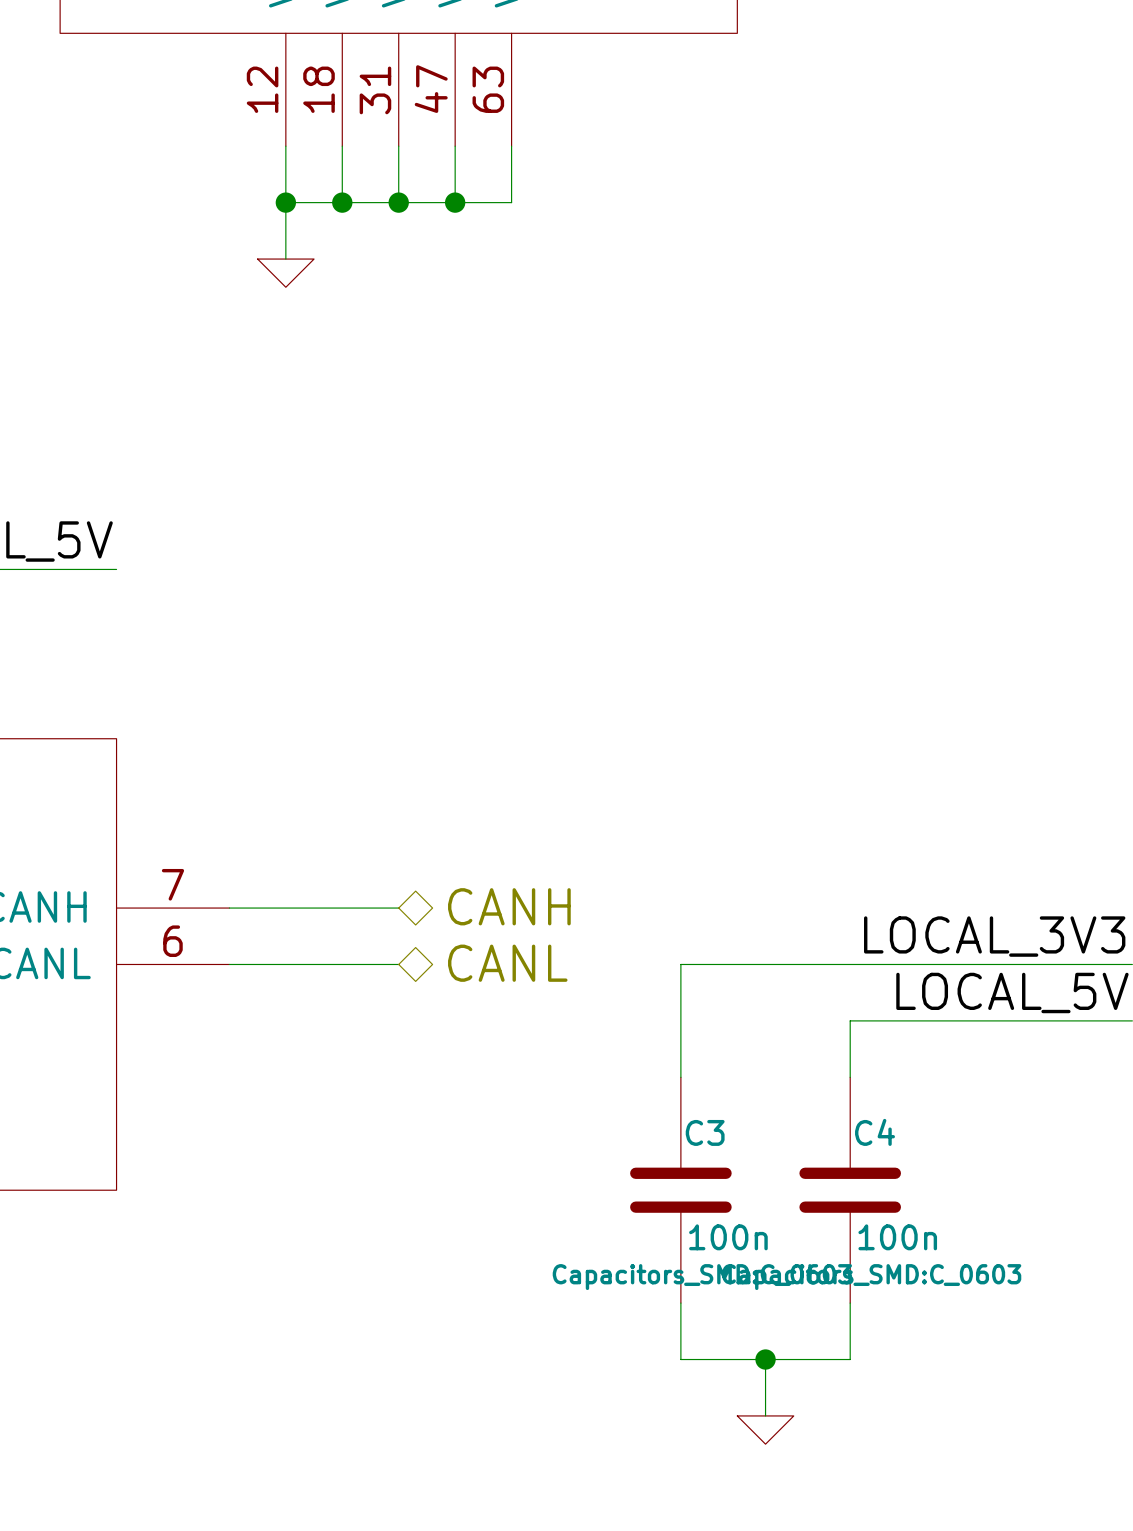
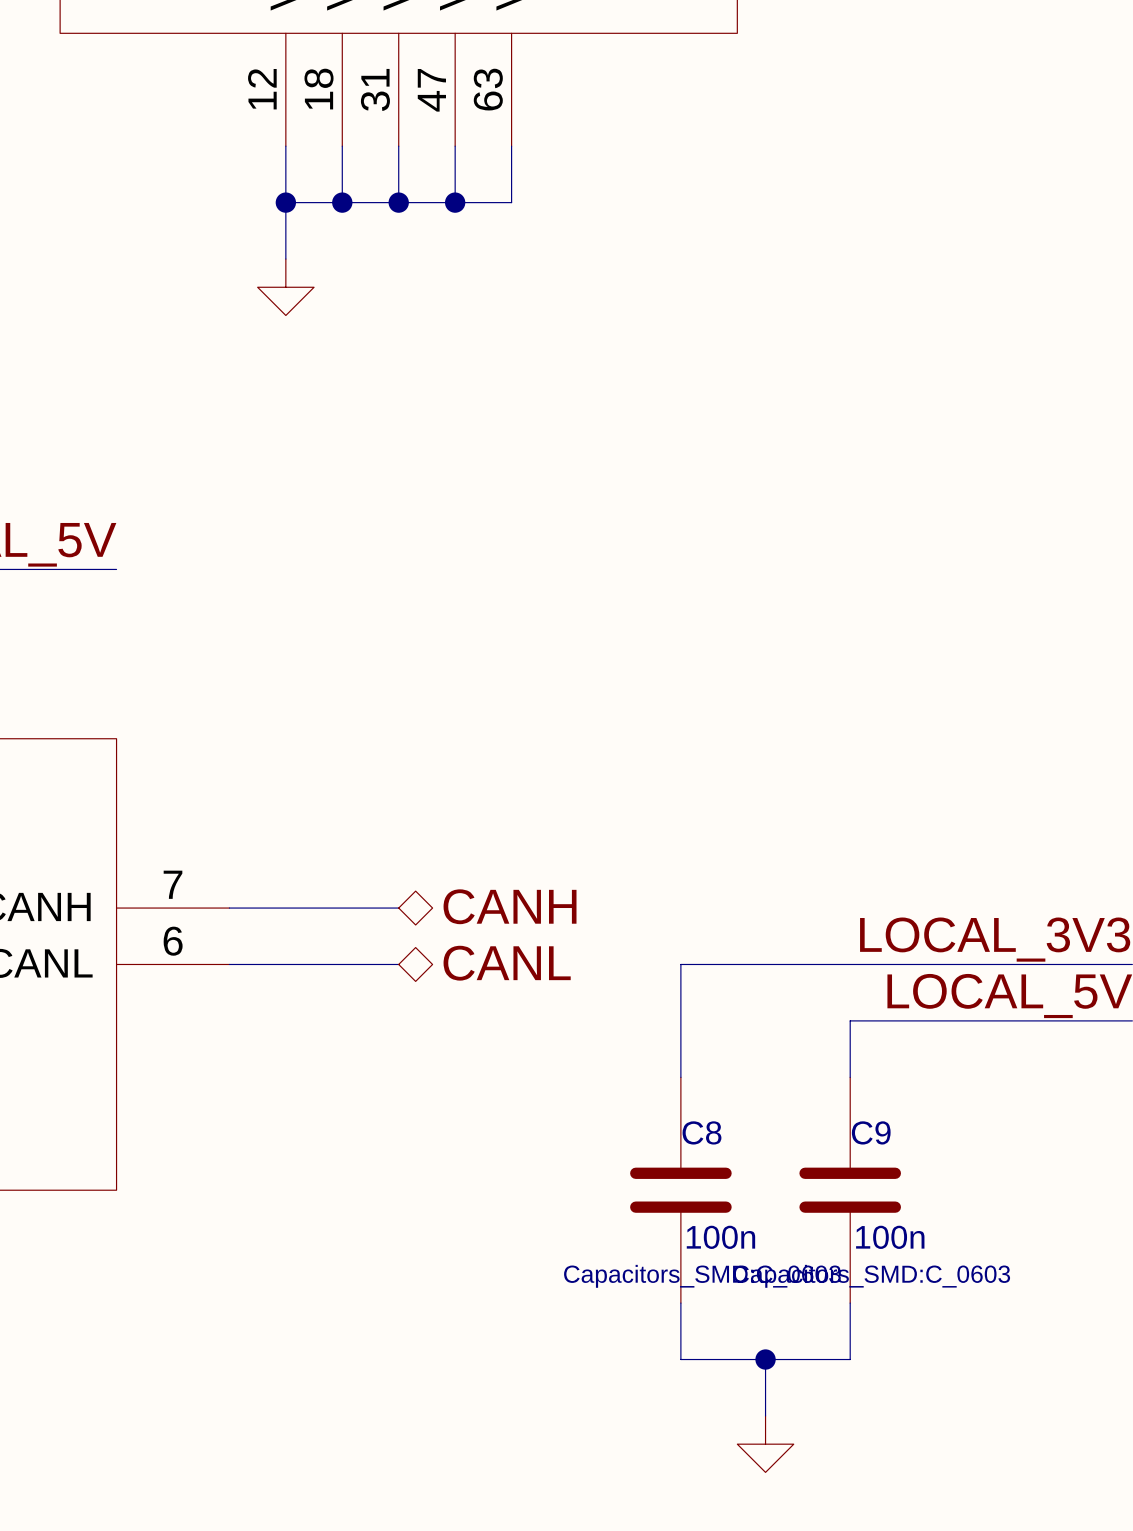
power symbol shape: [257, 259, 315, 288] -> [257, 259, 315, 316]
C3 name: C3 (705, 1132) -> C8 (701, 1132)
C4 name: C4 (875, 1132) -> C9 (871, 1132)
power symbol shape: [737, 1415, 794, 1445] -> [737, 1415, 794, 1473]

